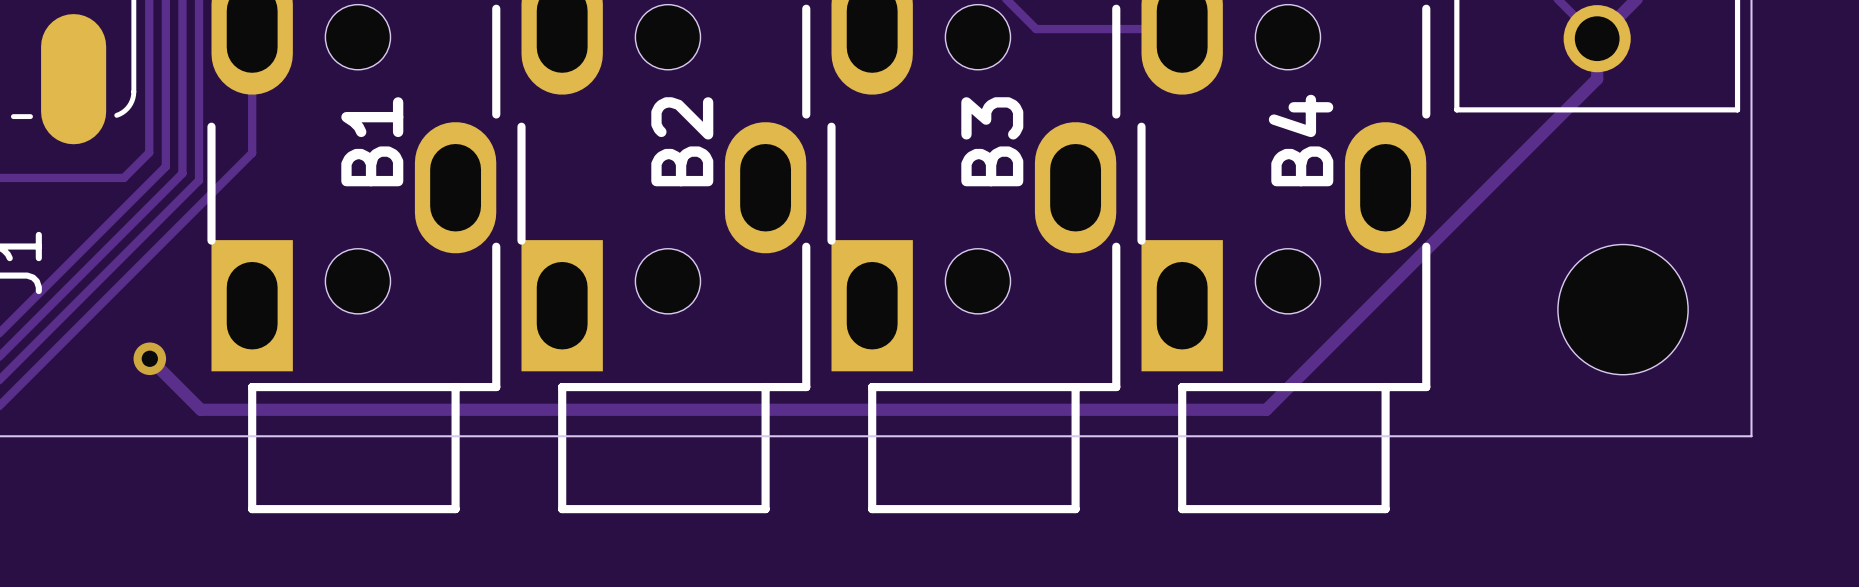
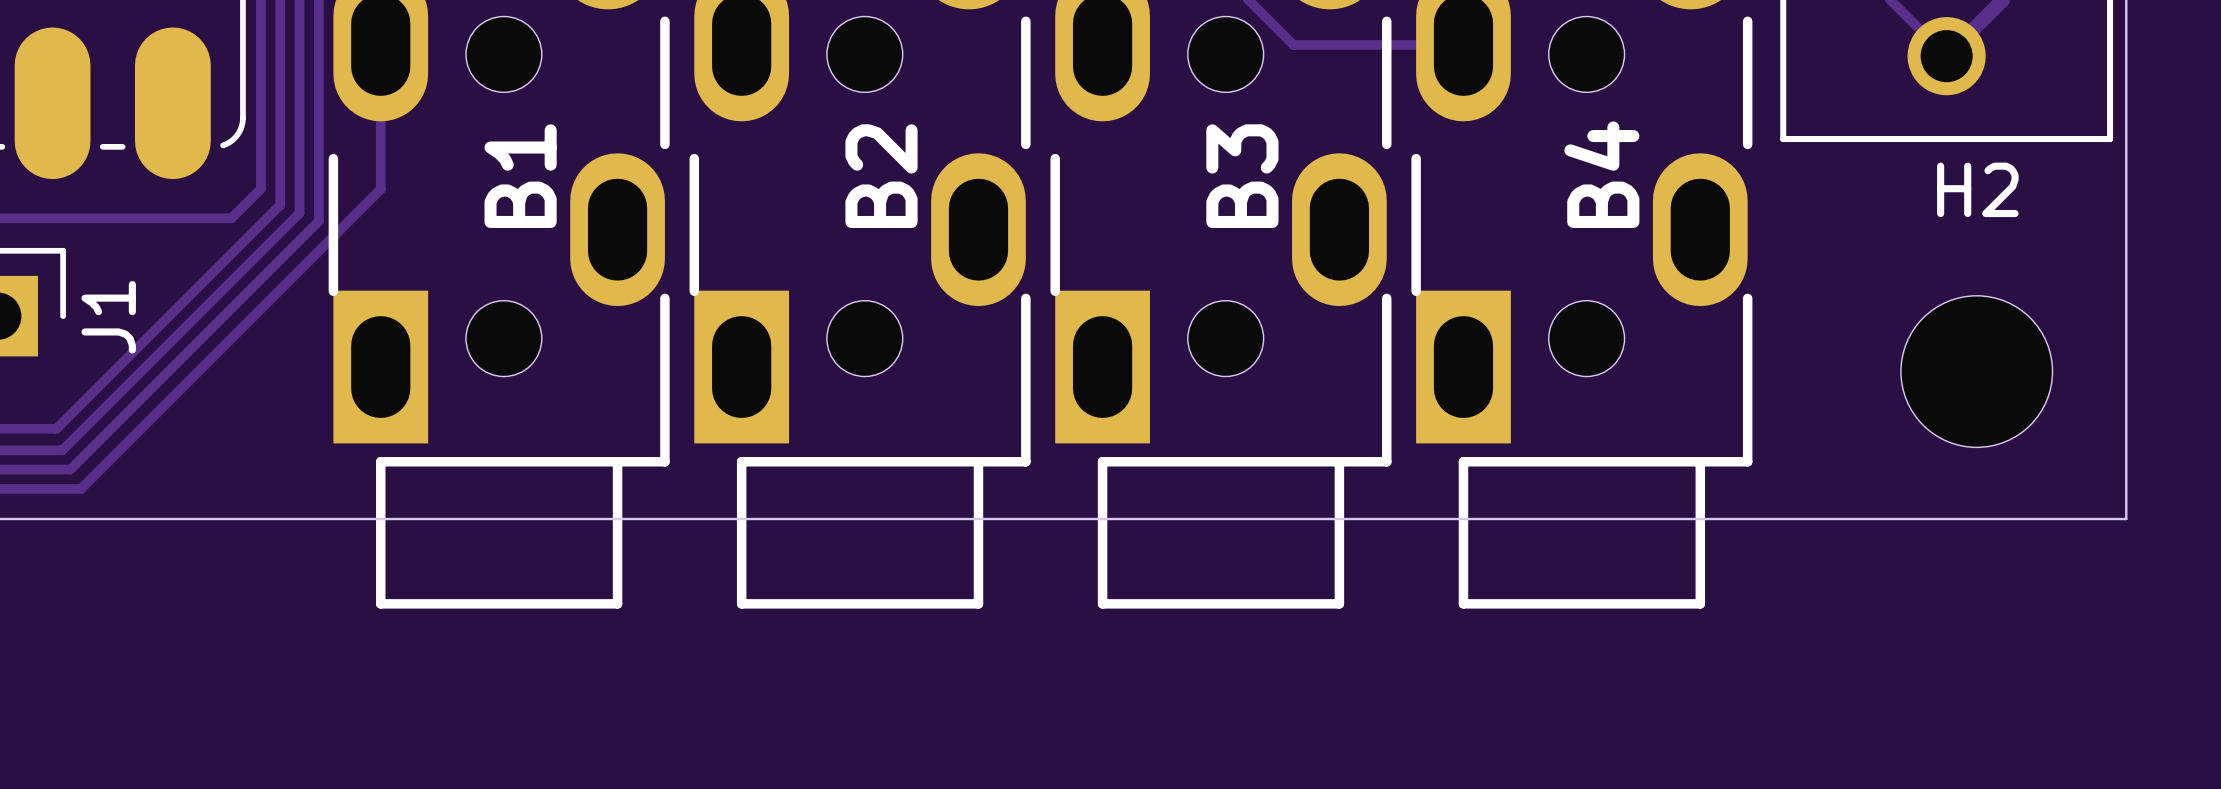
track: (1597, 38) (1597, 78) (1266, 409) (200, 409) (149, 358) -> none
H2 name: none -> H2 (1977, 189)
via: (149, 358) -> none

